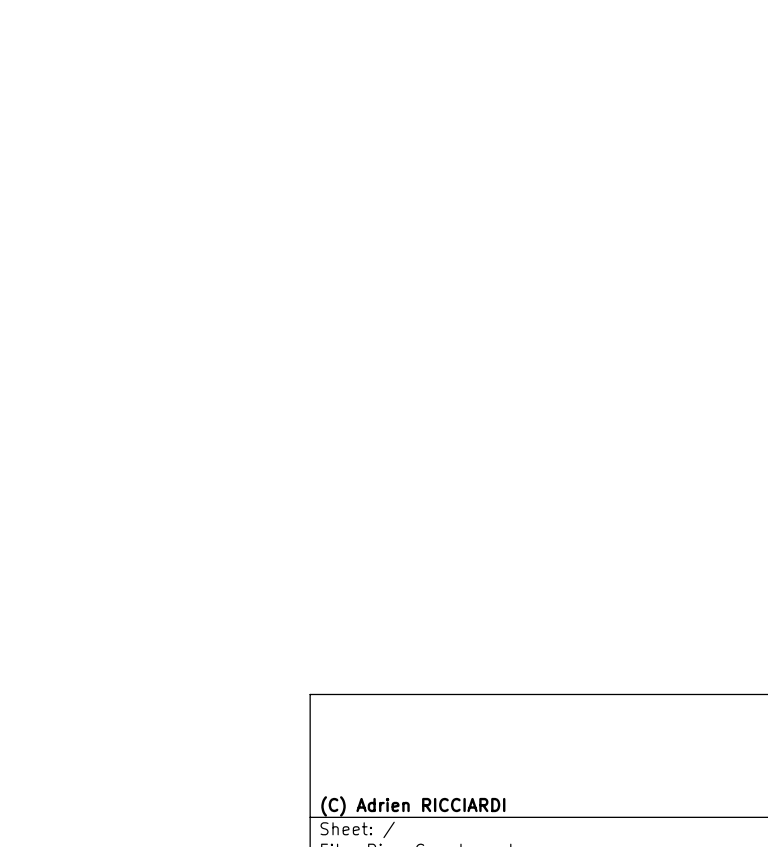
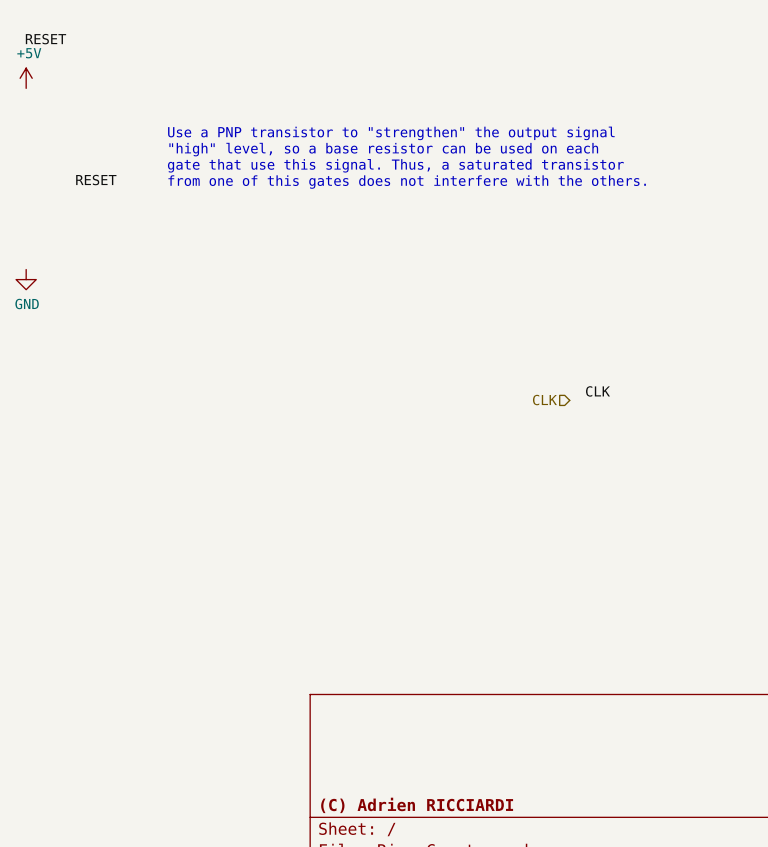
label: none -> RESET (45, 39)
power symbol: none -> +5V (26, 78)
text: none -> Use a PNP transistor to "strengthen" the output signal (391, 133)
text: none -> "high" level, so a base resistor can be used on each (383, 149)
text: none -> gate that use this signal. Thus, a saturated transistor (395, 165)
label: none -> RESET (96, 180)
text: none -> from one of this gates does not interfere with the others. (407, 182)
power symbol: none -> GND (26, 279)
label: none -> CLK (597, 391)
hierarchical label: none -> CLK (544, 400)

